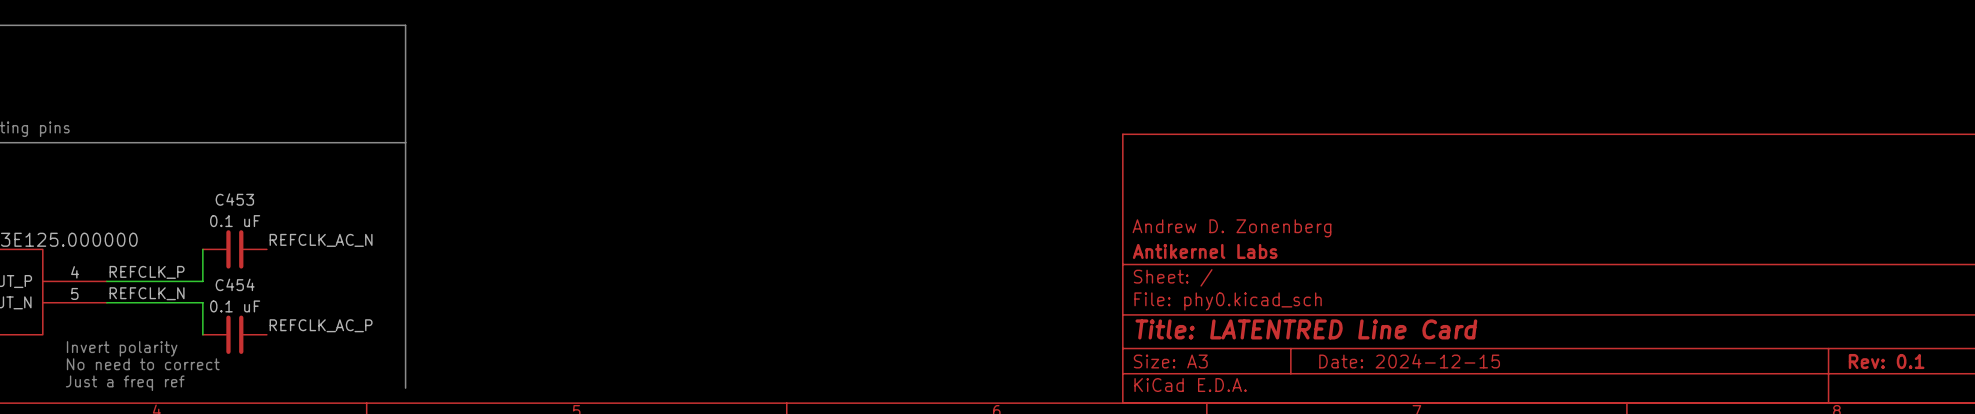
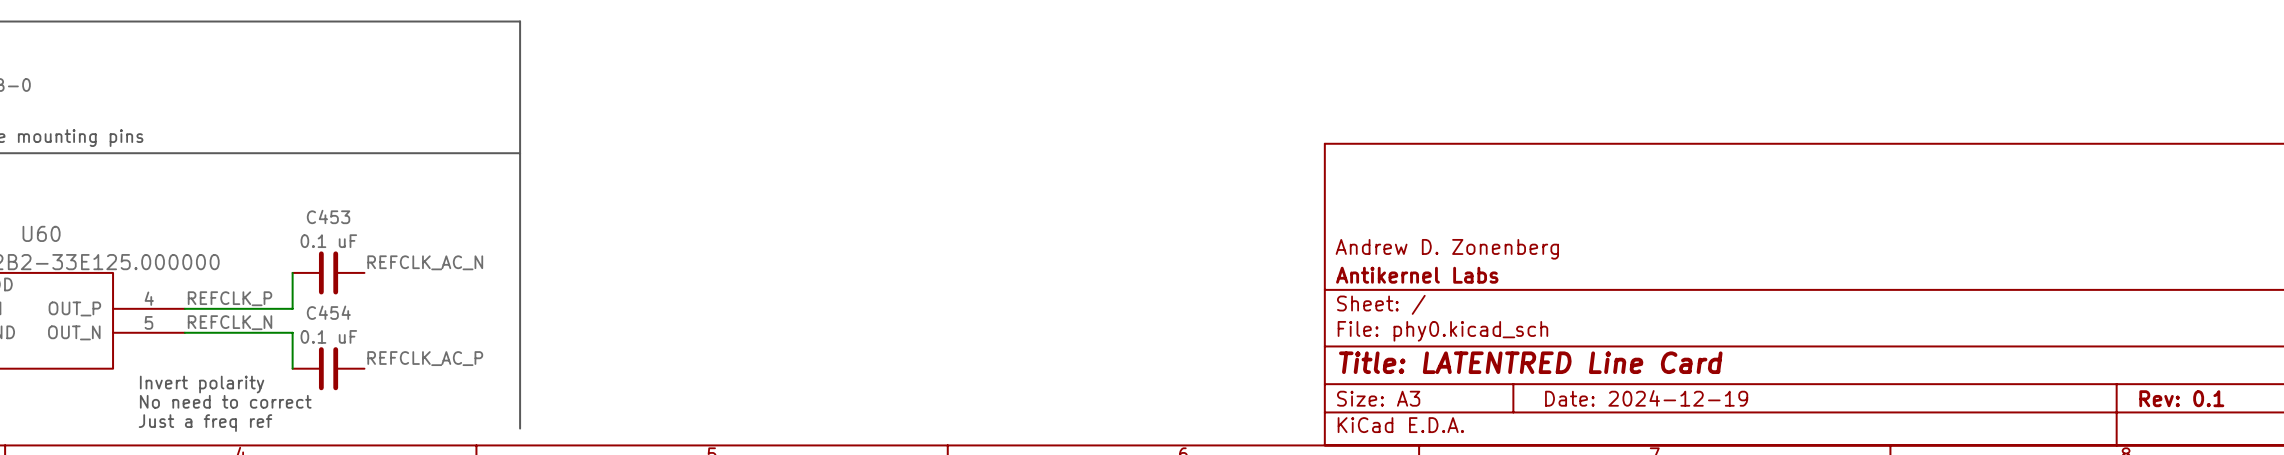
title block: Date: 2024-12-15 (1409, 361) -> Date: 2024-12-19 (1646, 398)

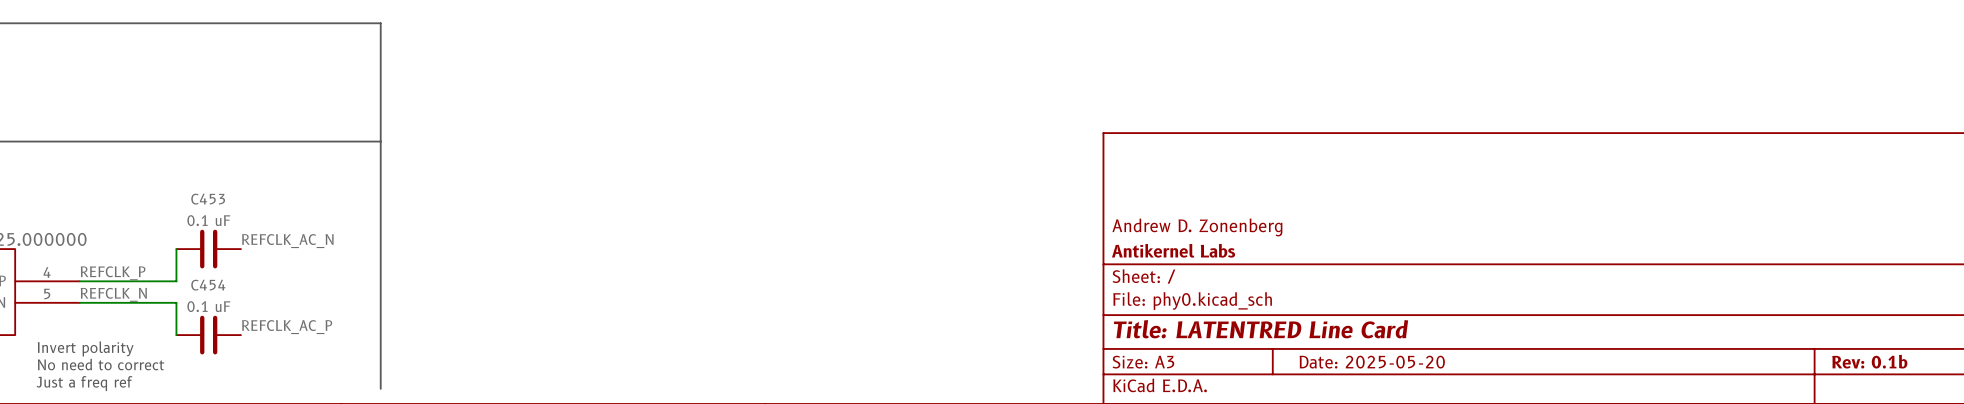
title block: Date: 2024-12-19 (1646, 398) -> Date: 2025-05-20 (1372, 362)
title block: Rev: 0.1 (2181, 398) -> Rev: 0.1b (1869, 361)

